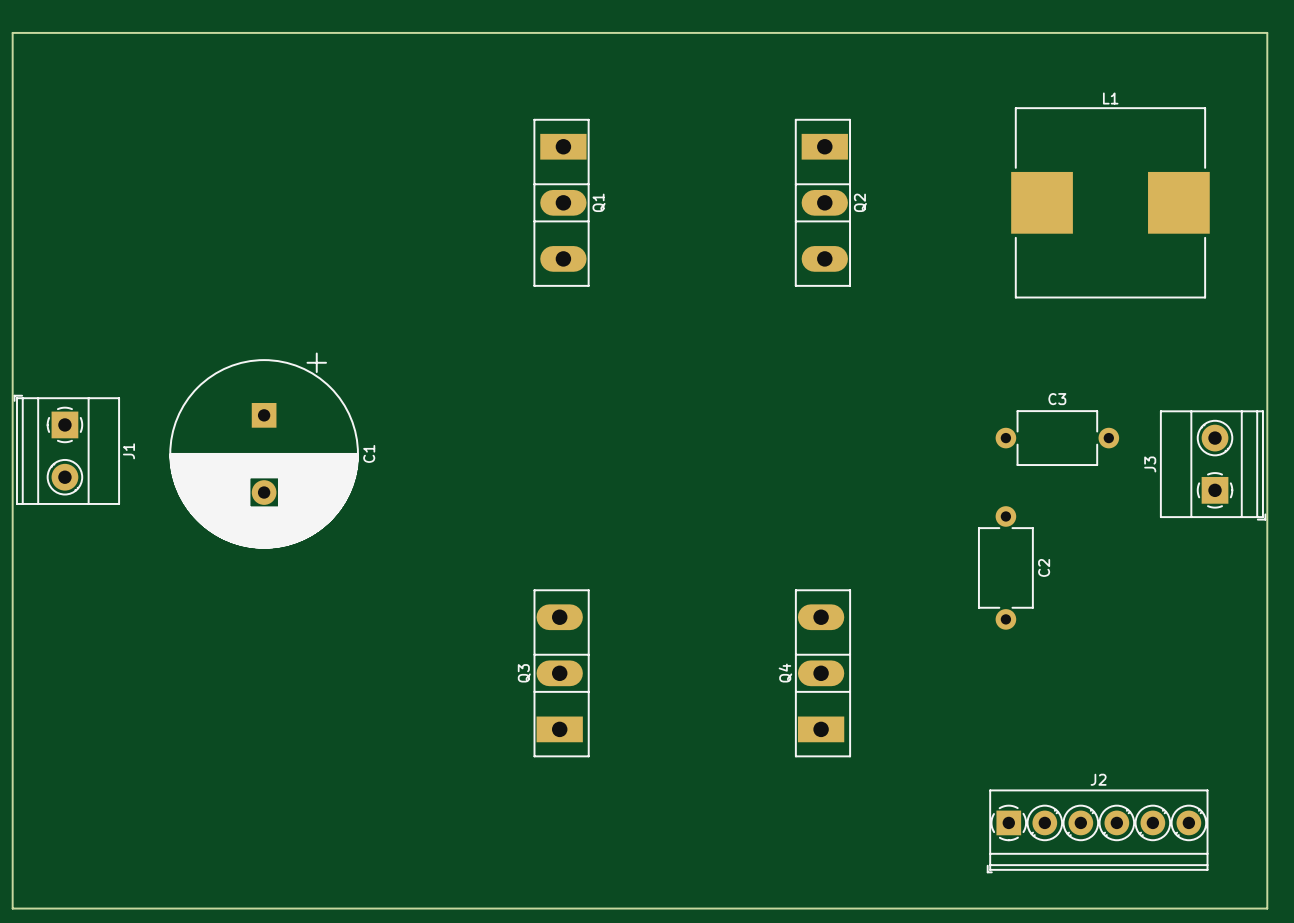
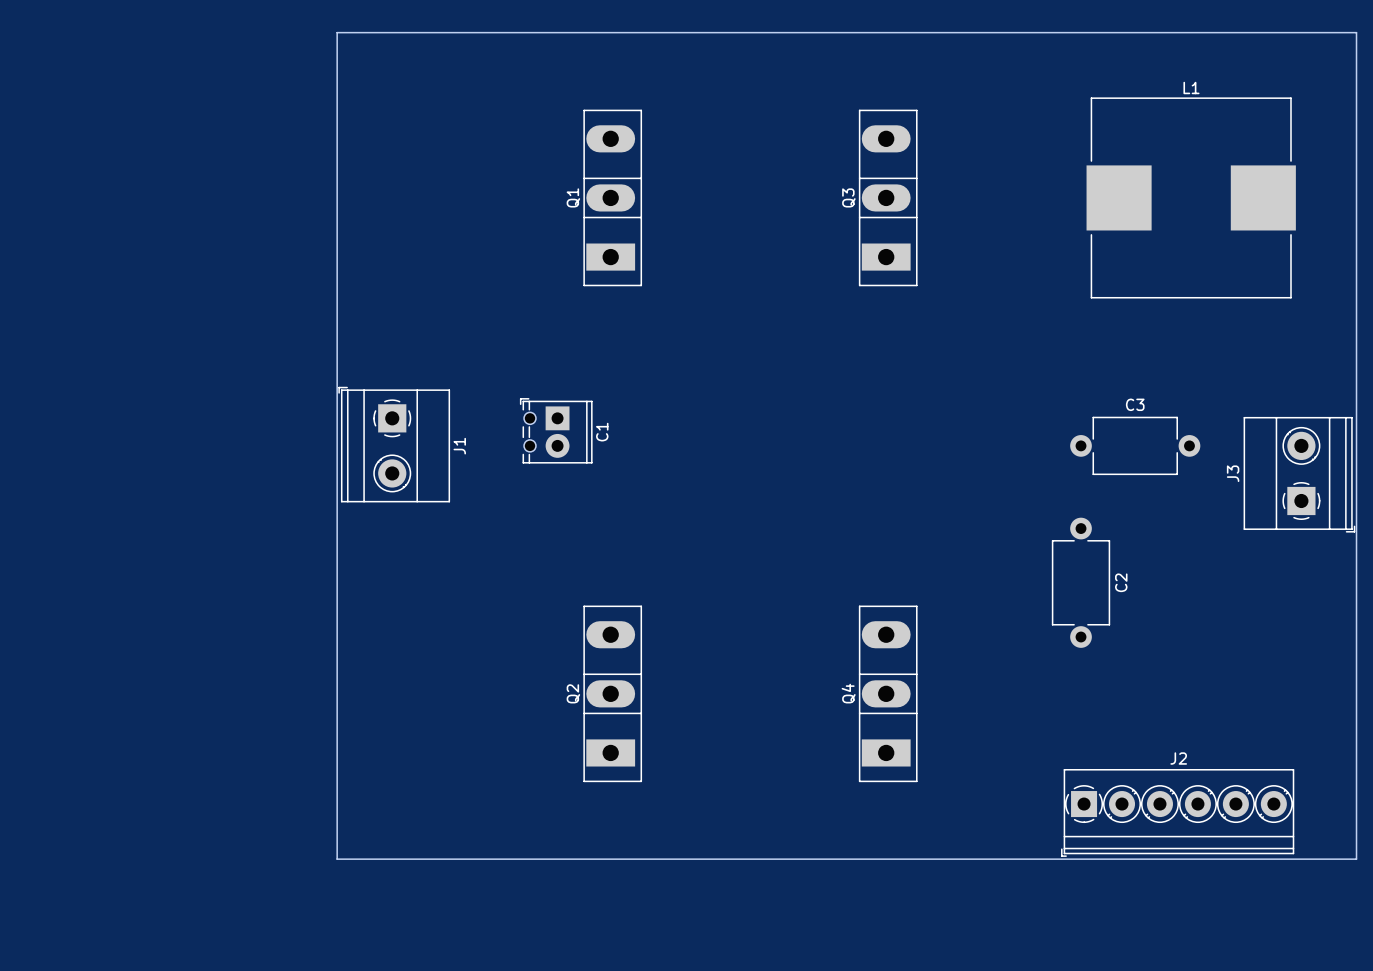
board edge: (1267, 46) (1267, 32) (12, 32) (12, 908) (1267, 908) (1267, 830) -> (1356, 32) (337, 32) (337, 859) (1356, 859)
Q1 rotation: 0° (561, 202) -> 180° (612, 197)
Q2: (822, 202) -> none
Q3: none -> (888, 197)
C1 footprint: [169, 352, 359, 549] -> [520, 398, 593, 464]
J1 position: (66, 449) -> (394, 444)
C1 name position: C1 (369, 453) -> C1 (602, 432)
Q3 name: Q3 (524, 673) -> Q2 (573, 693)
J2 position: (1097, 831) -> (1177, 812)

